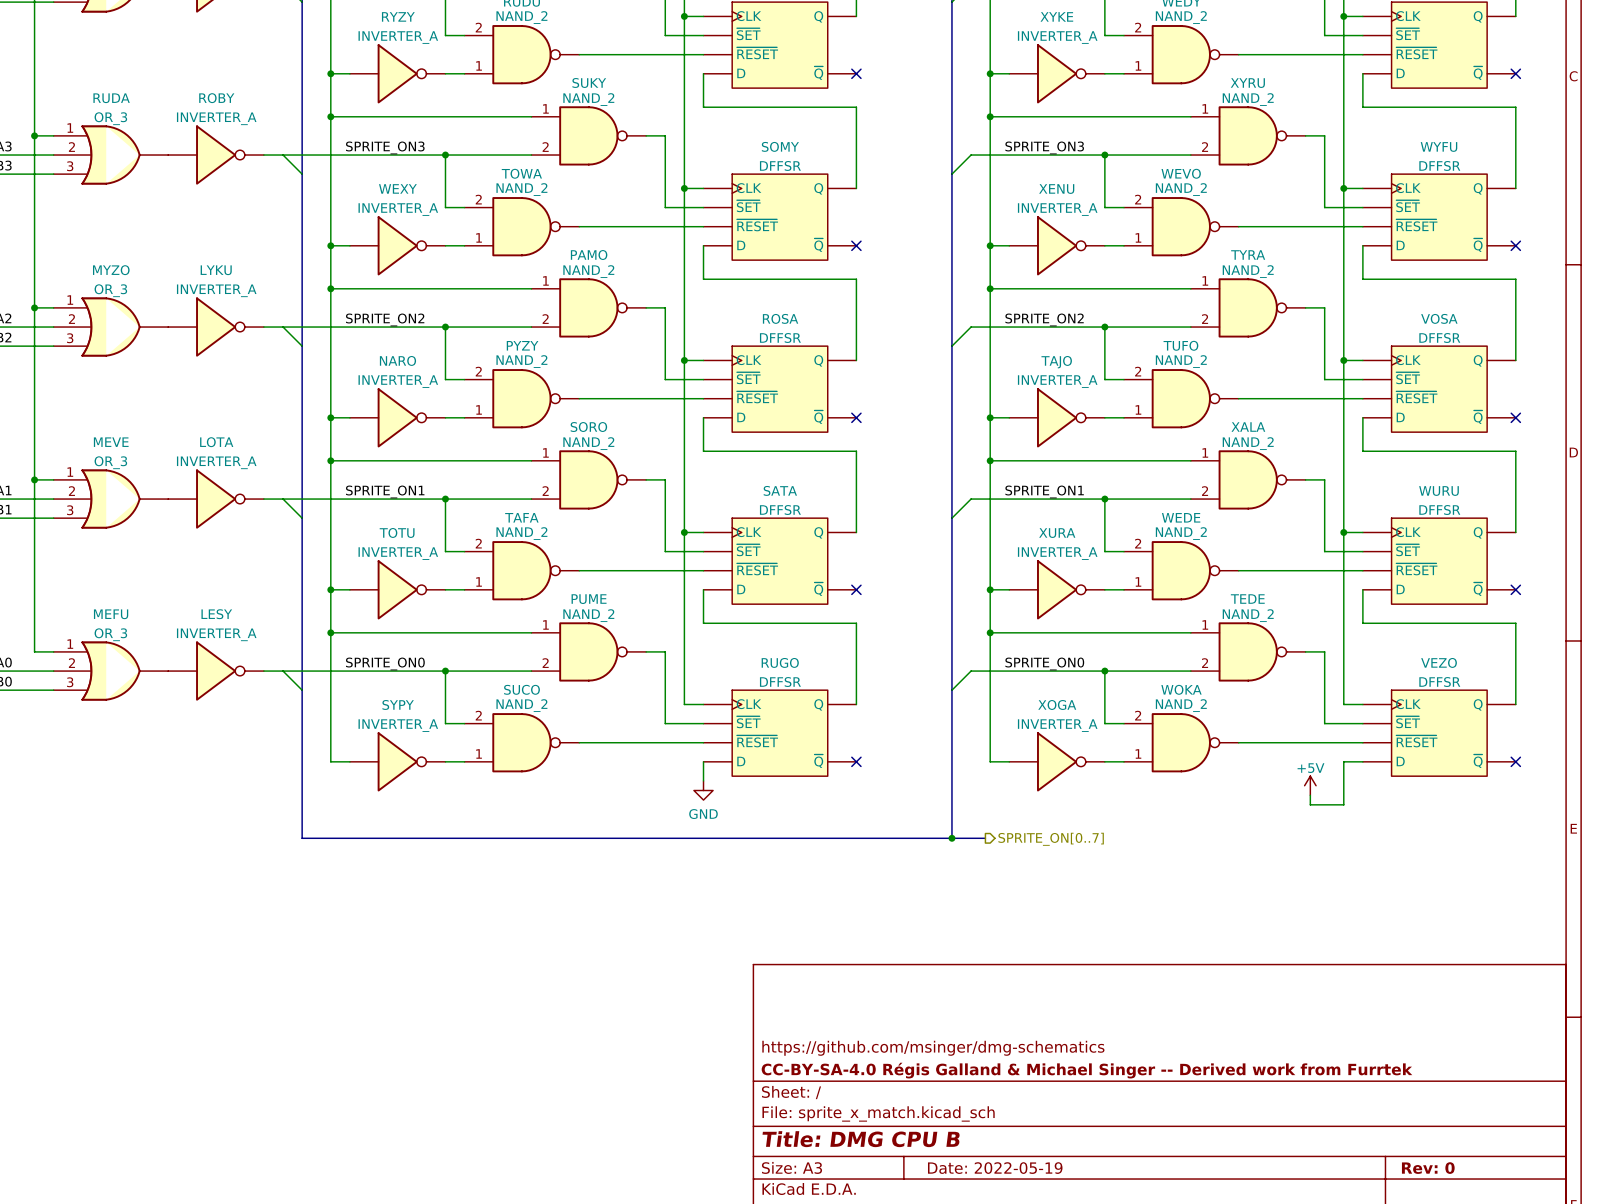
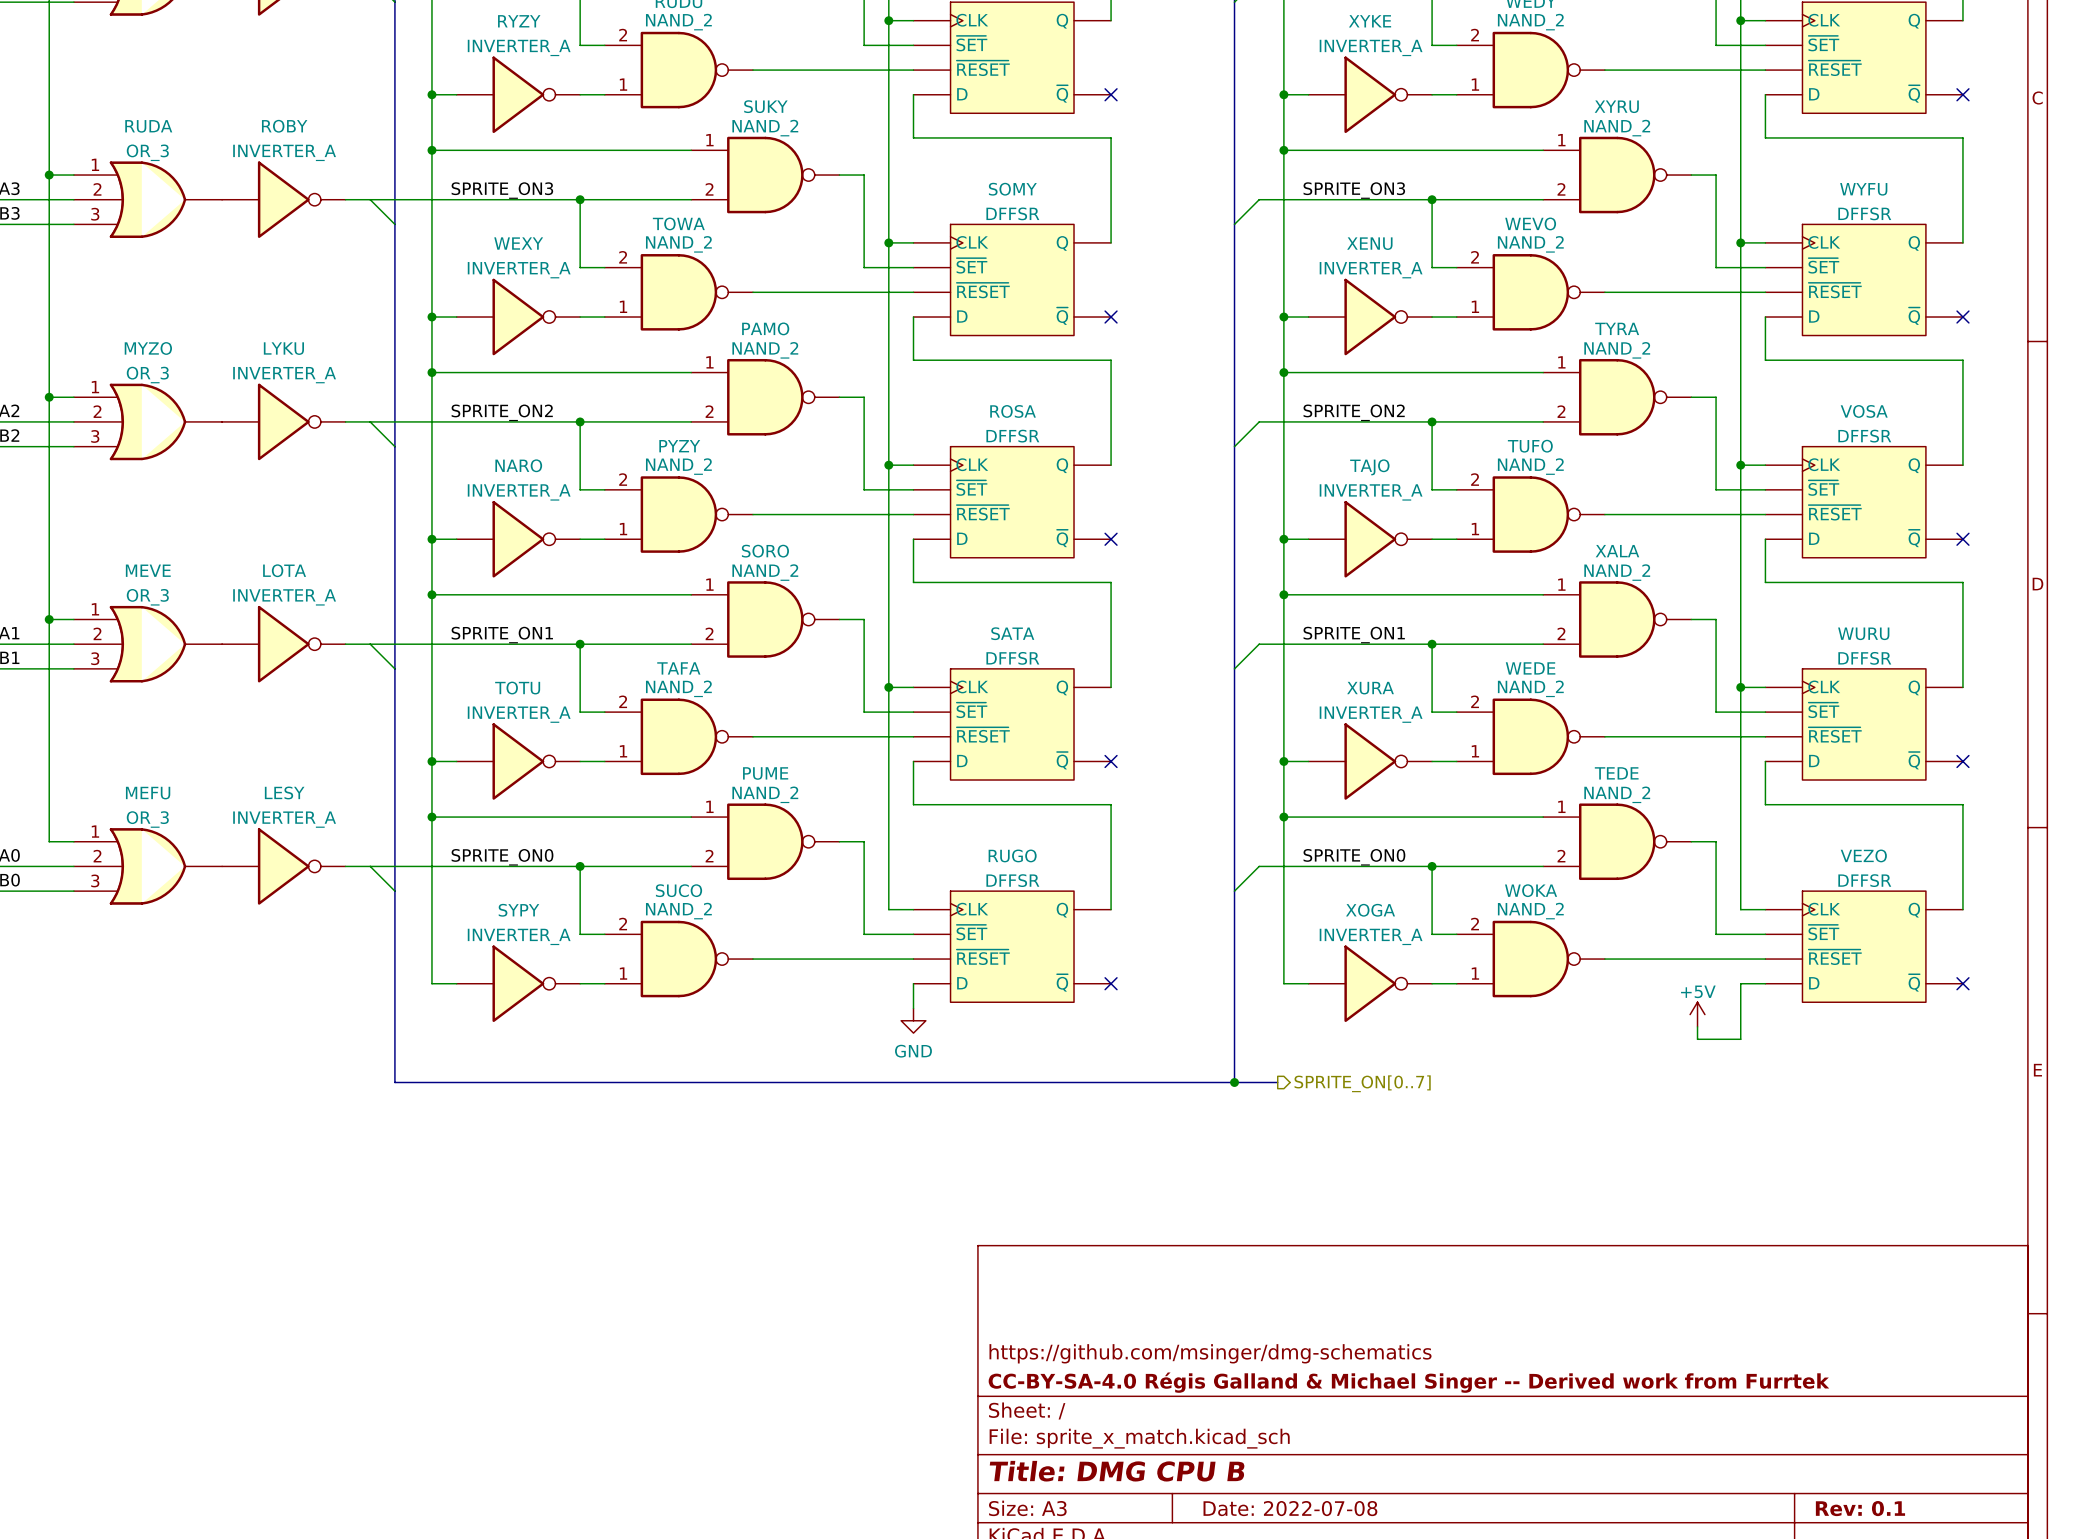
title block: Date: 2022-05-19 (995, 1168) -> Date: 2022-07-08 (1290, 1508)
title block: Rev: 0 (1428, 1168) -> Rev: 0.1 (1860, 1508)

